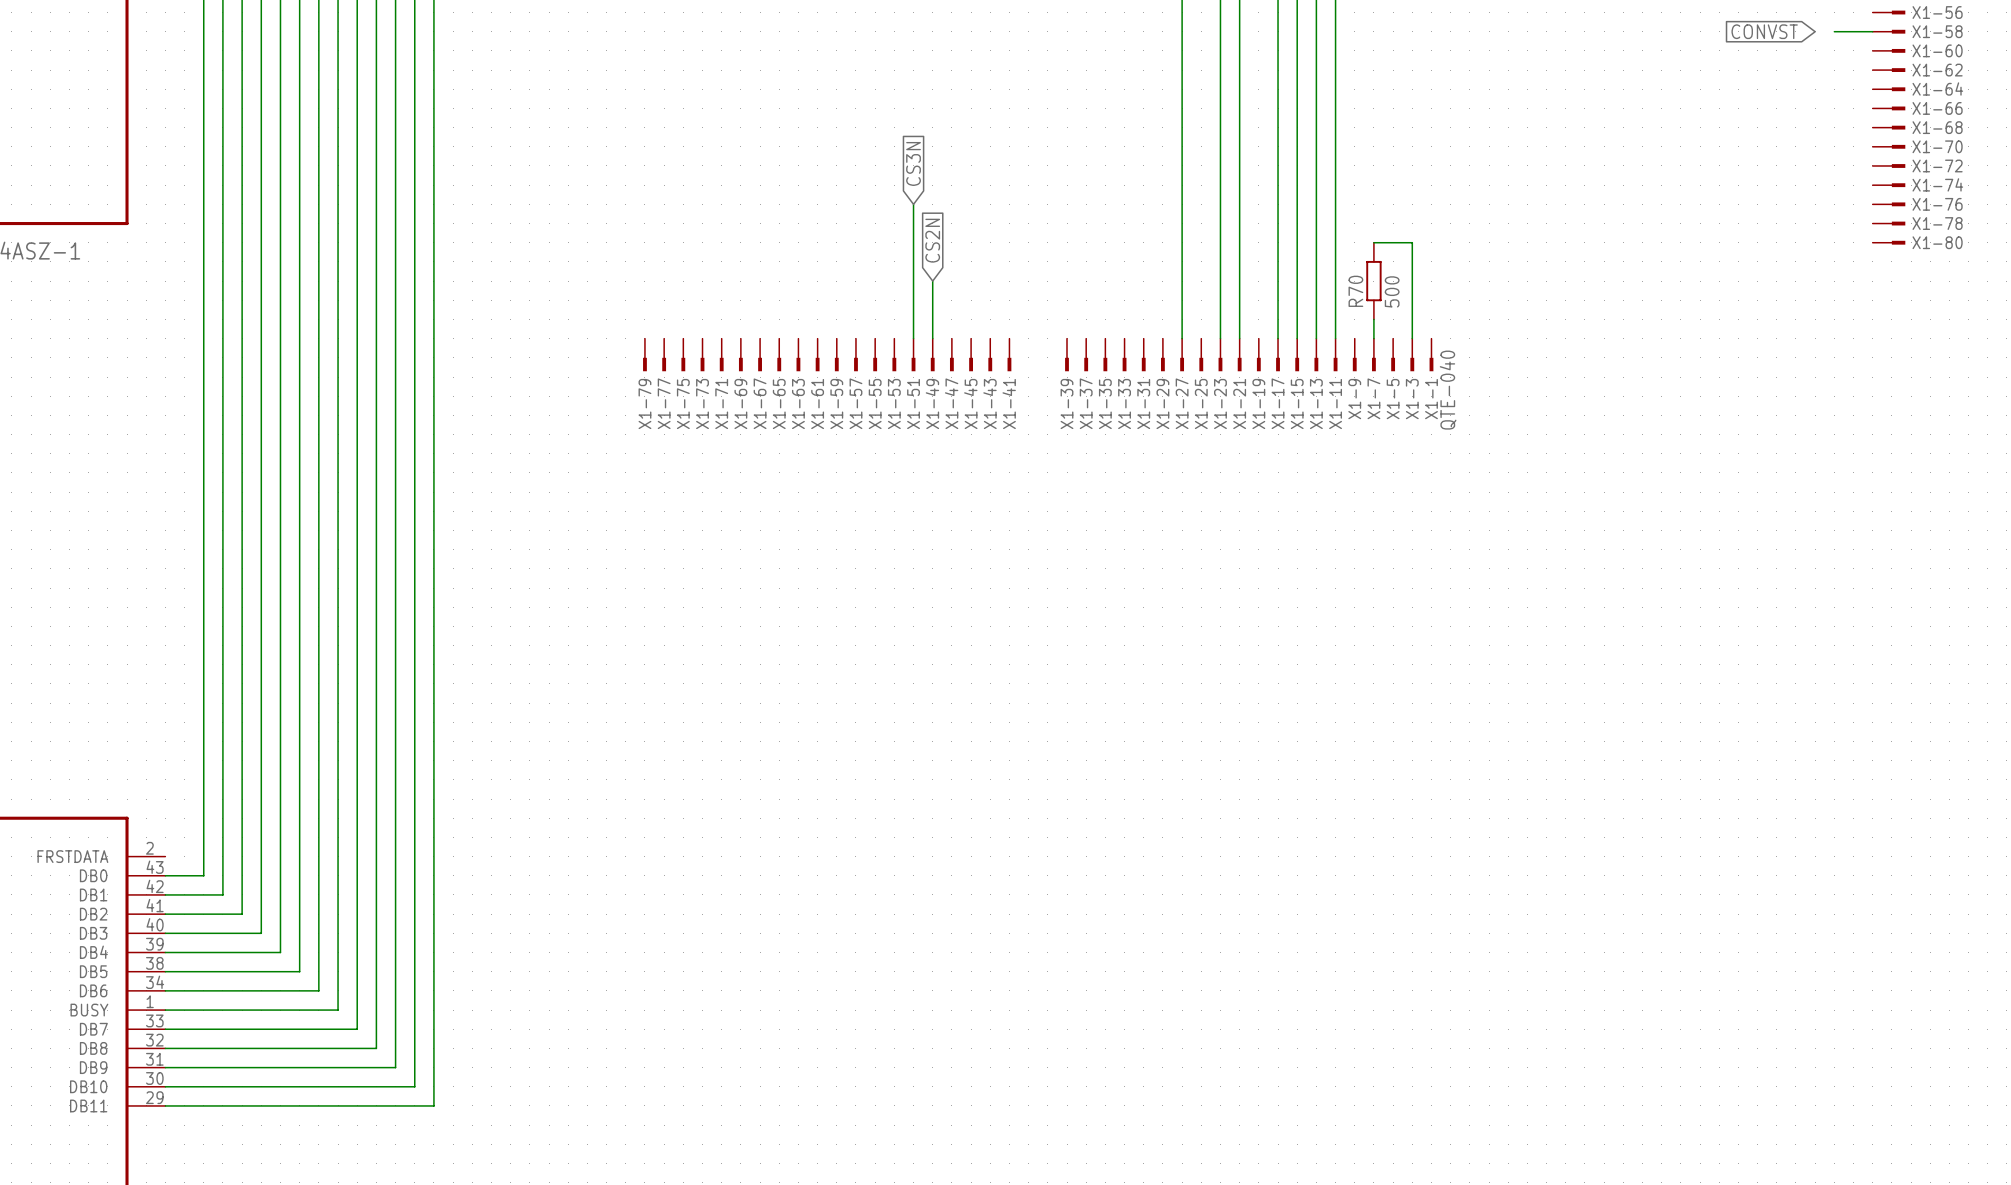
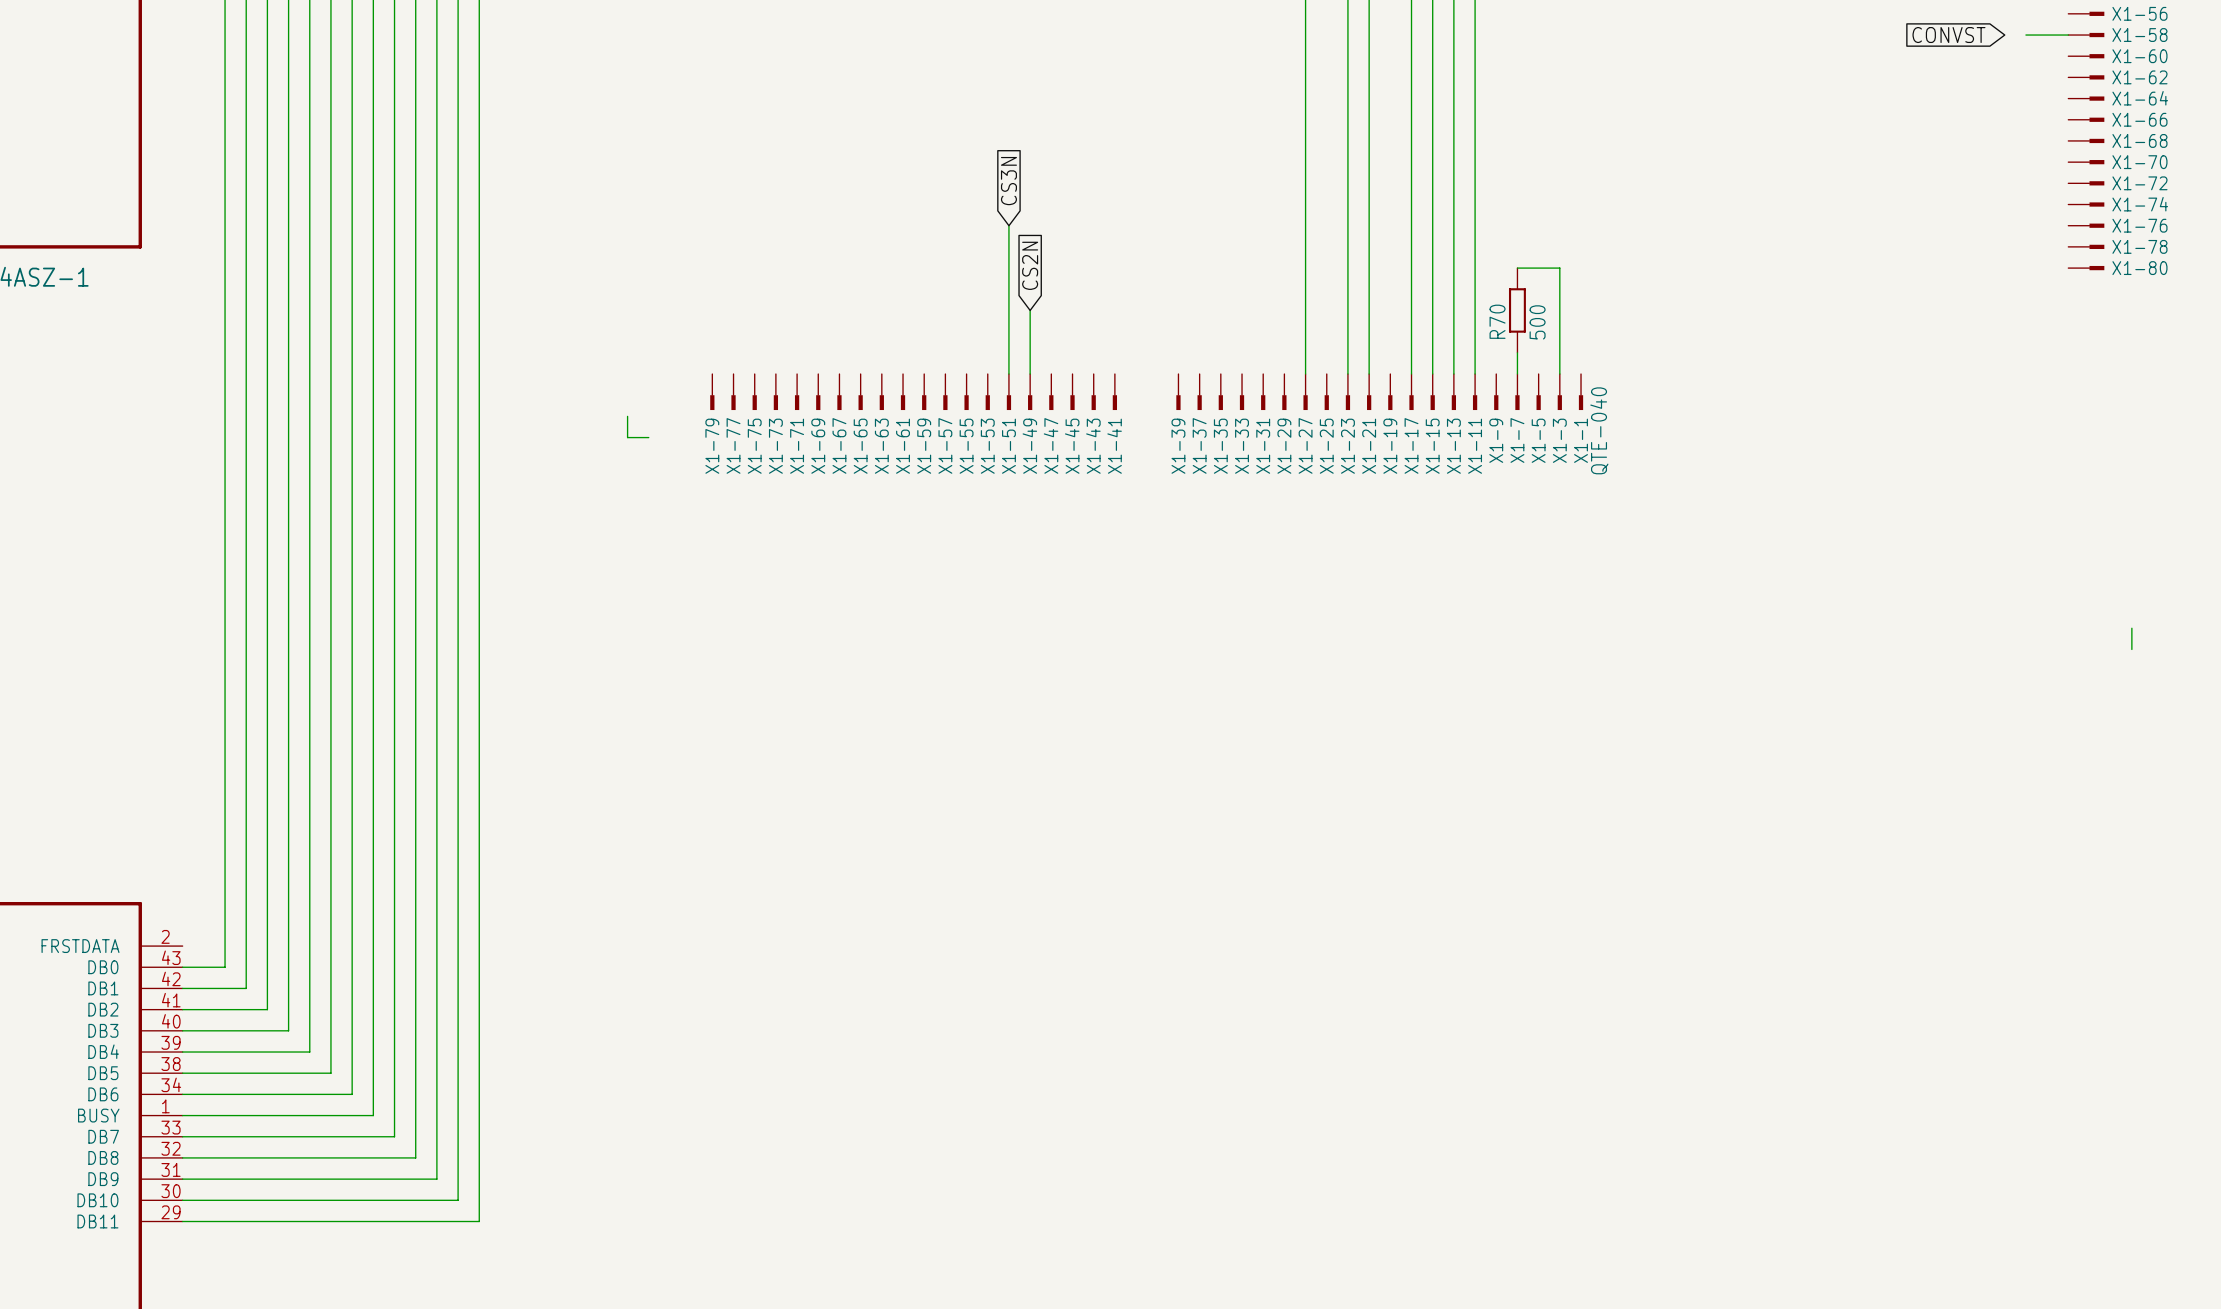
wire: none -> (627, 416) (627, 437) (648, 437)
wire: none -> (2131, 628) (2131, 649)

